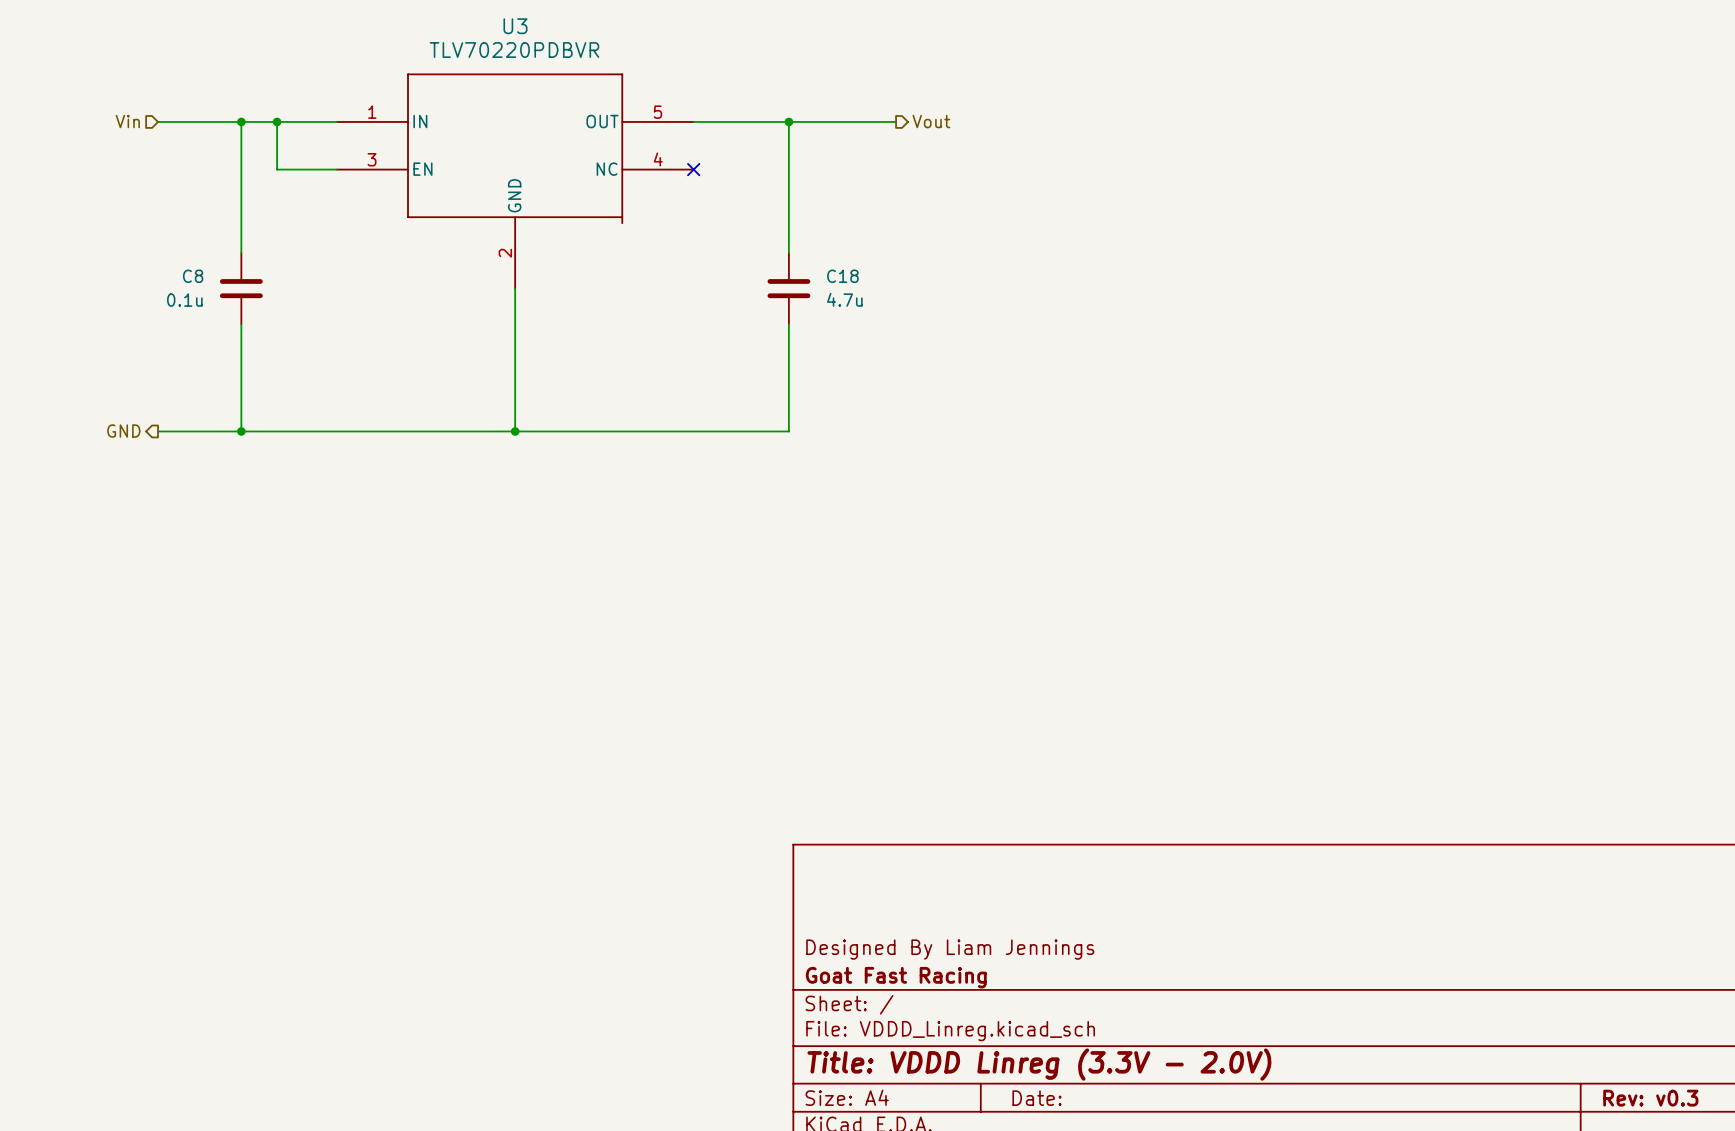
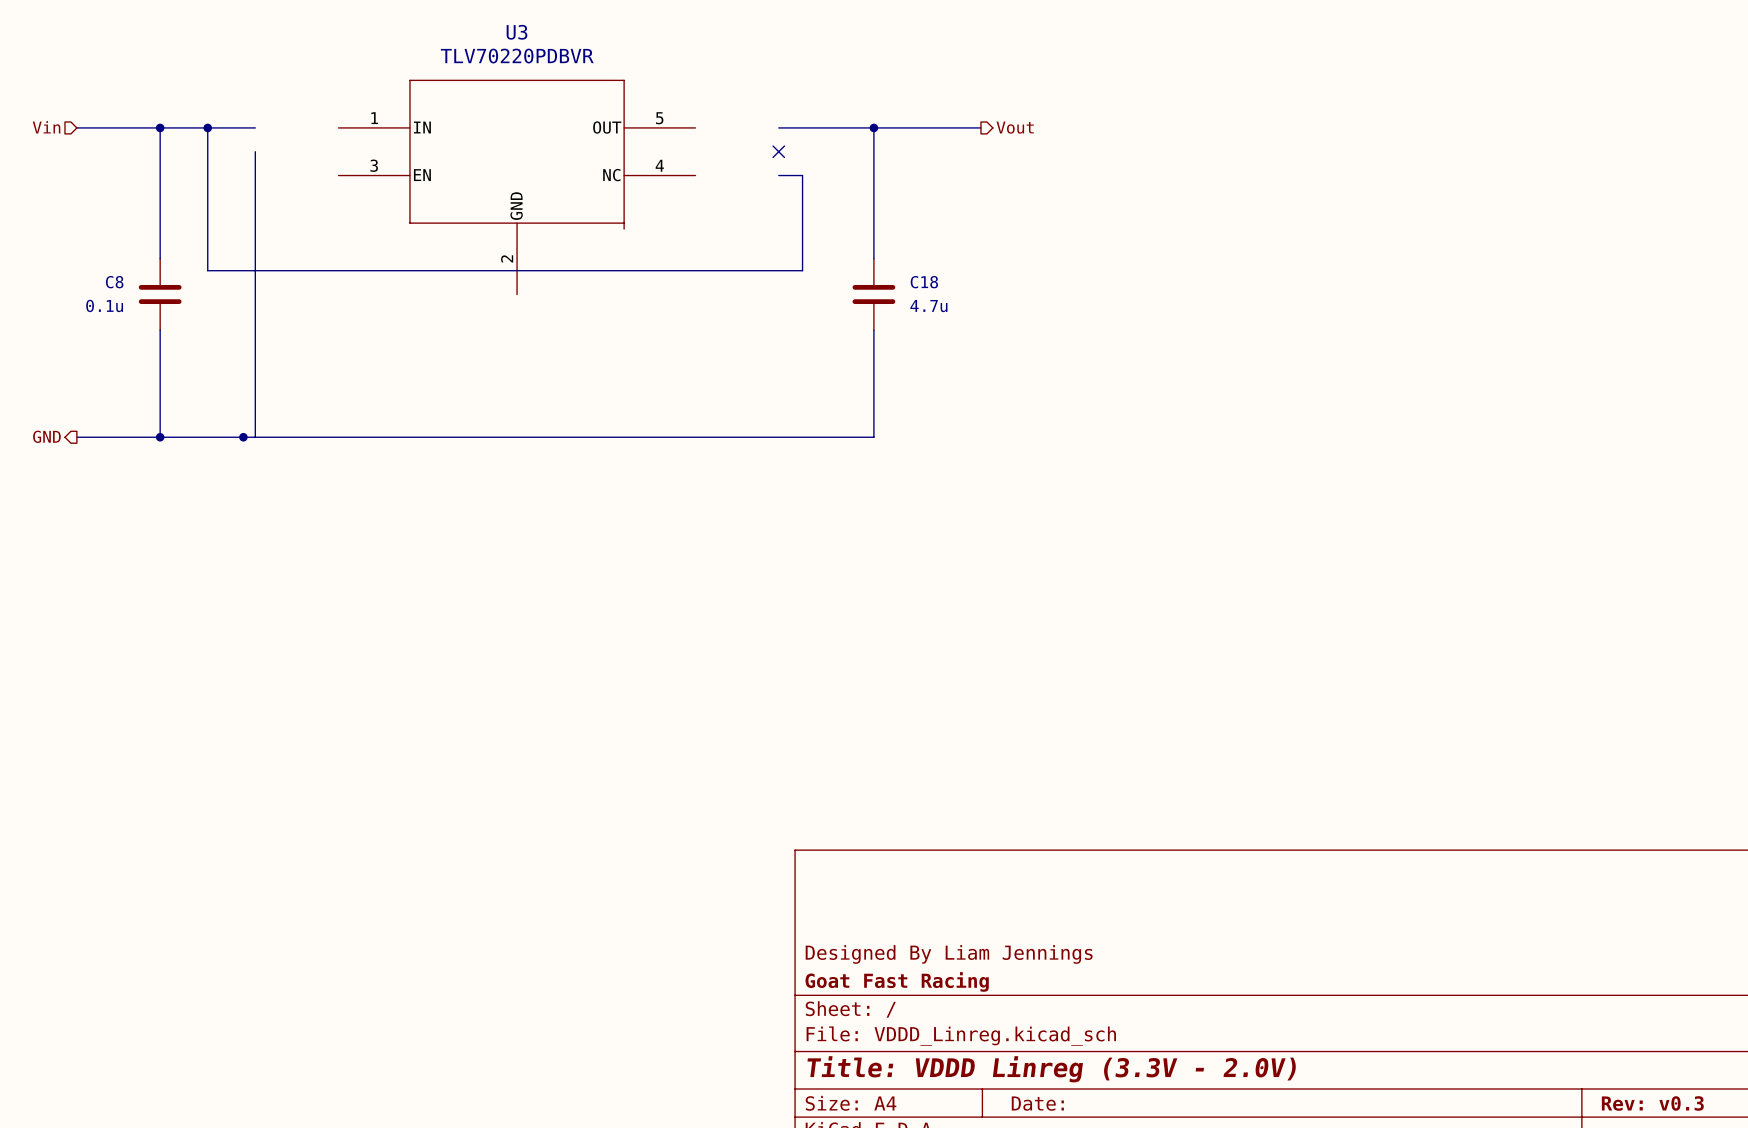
wire: none -> (76, 127) (160, 127) (160, 258)
hierarchical label position: Vin (127, 121) -> Vin (46, 127)
junction: none -> (160, 127)
wire: none -> (207, 127) (207, 270) (802, 270) (802, 175) (778, 175)
junction: none -> (207, 127)
wire: (241, 121) (241, 252) -> none
junction: (241, 121) -> none
wire: (253, 121) (336, 121) -> none
wire: (277, 121) (277, 169) (336, 169) -> none
junction: (277, 121) -> none
wire: (693, 121) (777, 121) -> (897, 127) (980, 127)
wire: (788, 121) (788, 252) -> (873, 127) (873, 258)
junction: (788, 121) -> none
junction: none -> (873, 127)
hierarchical label position: Vout (931, 121) -> Vout (1015, 127)
wire: none -> (255, 151) (255, 437)
no-connect mark: none -> (778, 151)
no-connect mark: (693, 169) -> none
C8 position: (241, 288) -> (160, 294)
wire: (515, 288) (515, 431) -> none
C18 position: (788, 288) -> (873, 294)
wire: none -> (160, 330) (160, 437) (76, 437)
wire: (241, 324) (241, 431) -> none
wire: (788, 324) (788, 431) -> (873, 330) (873, 437) (790, 437)
hierarchical label position: GND (123, 431) -> GND (46, 436)
junction: none -> (160, 437)
junction: (515, 431) -> none

